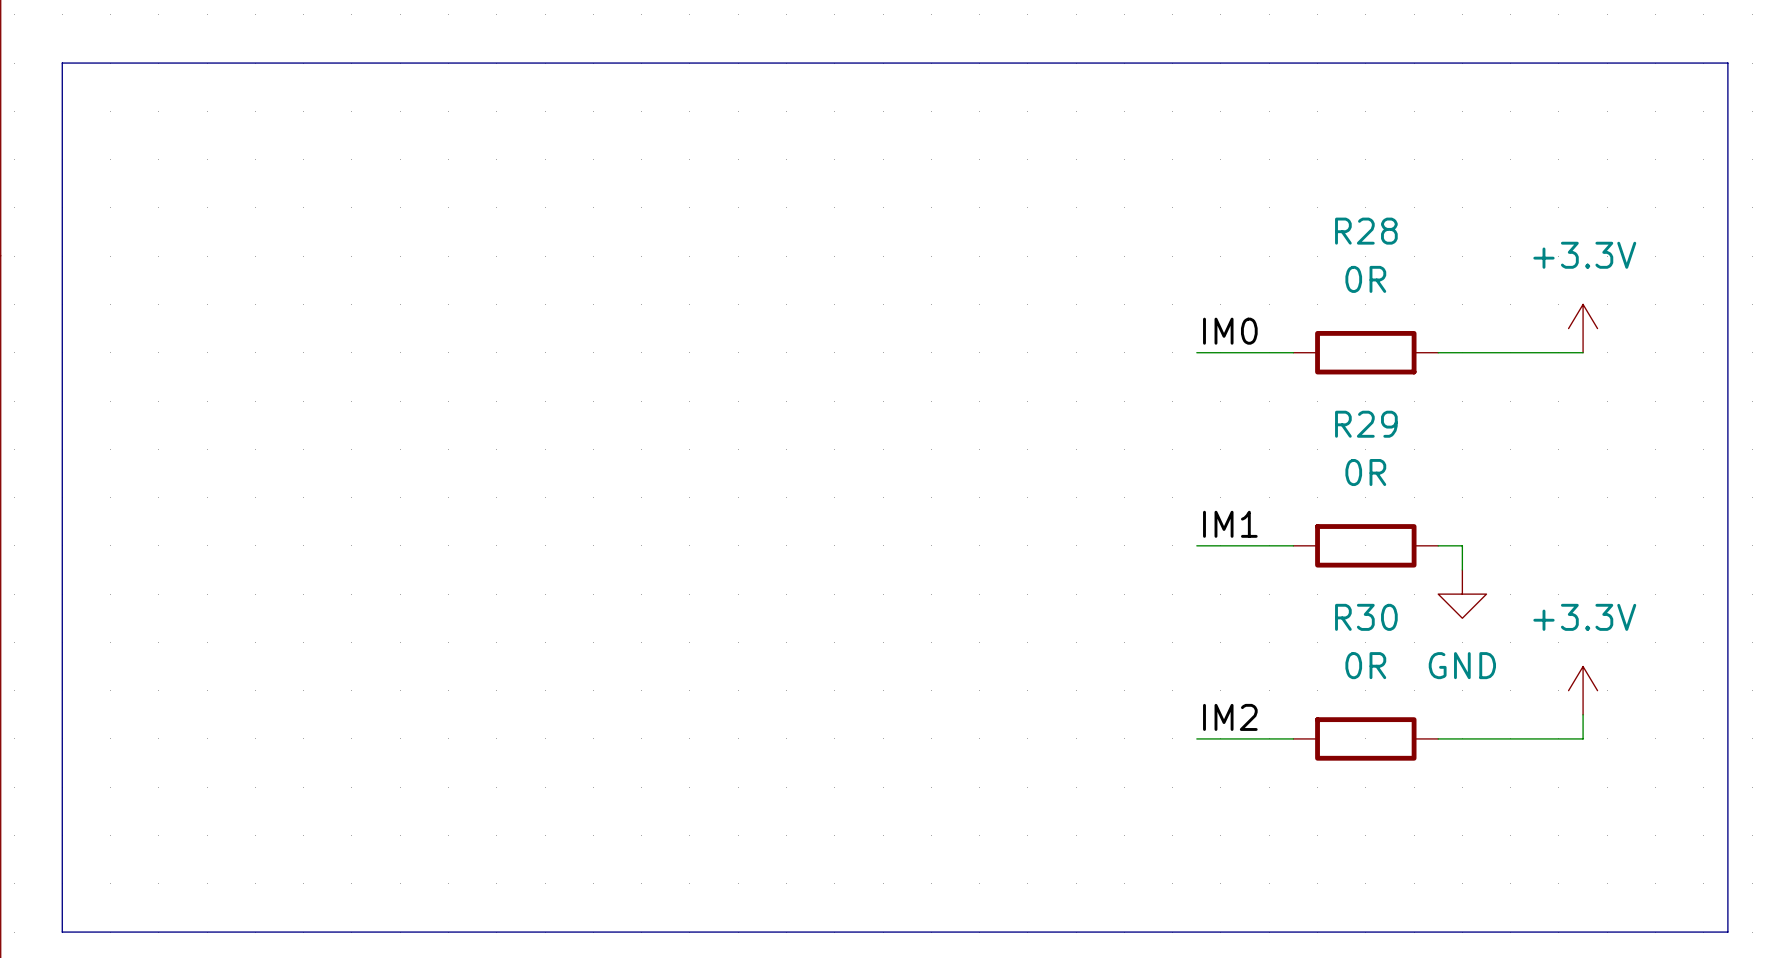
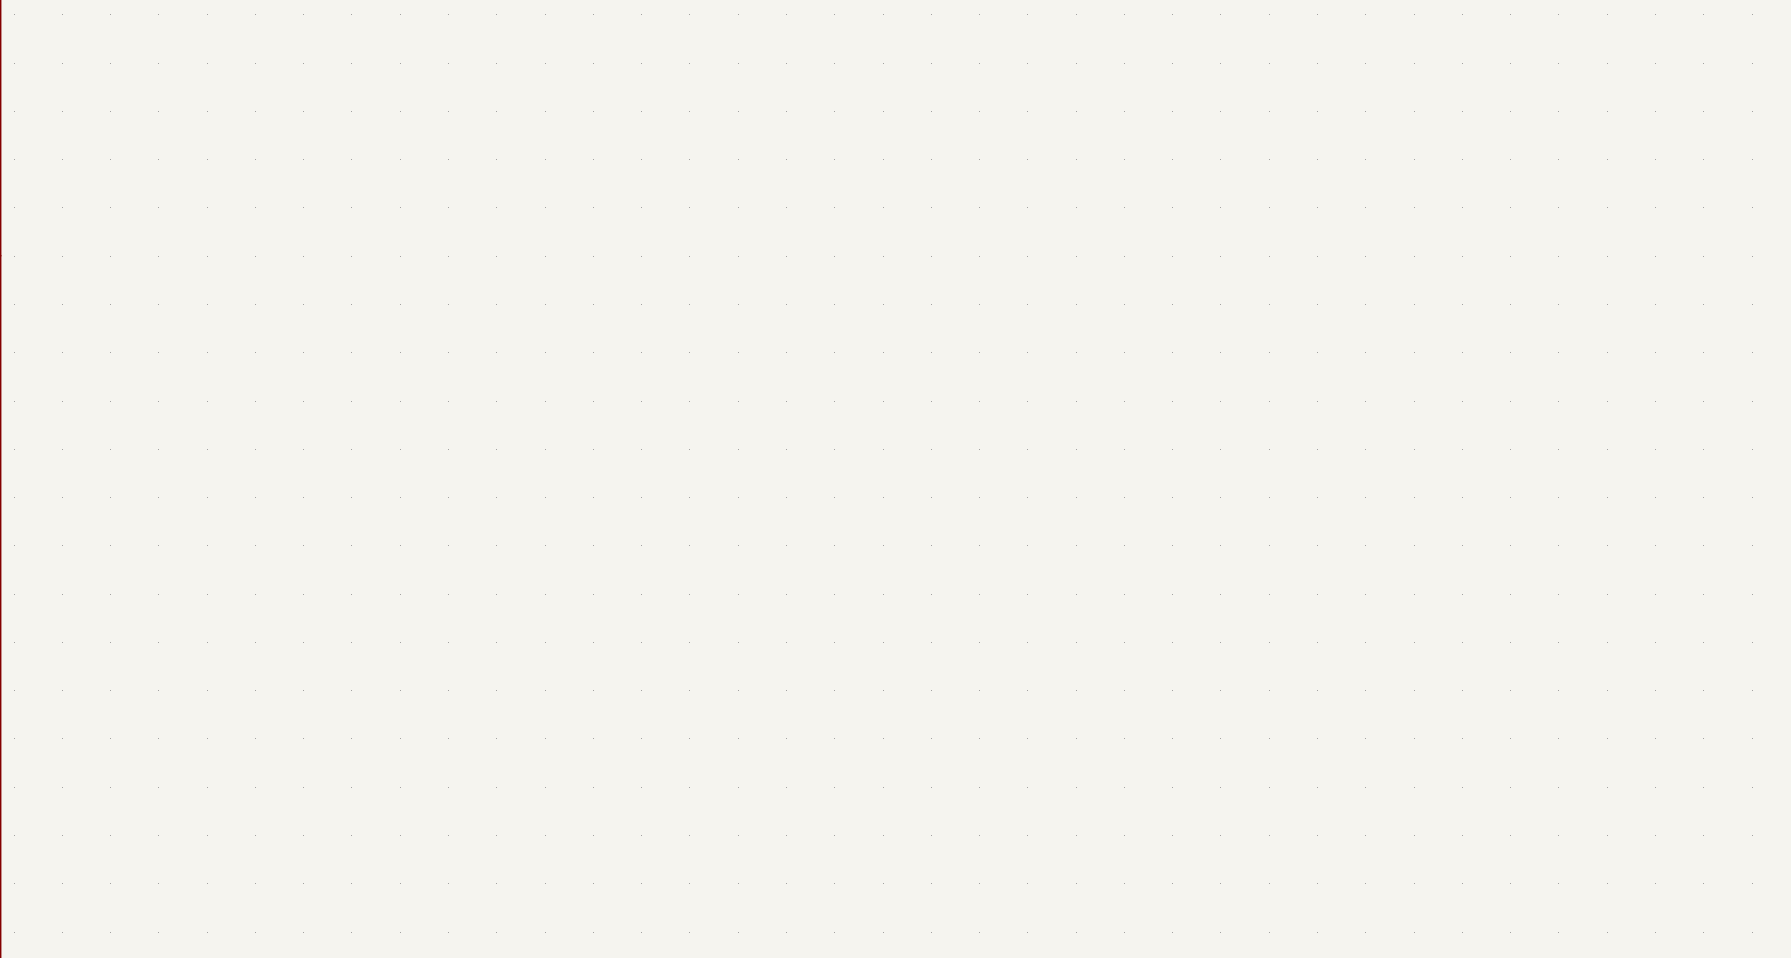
line: (62, 63) (1727, 63) (1727, 932) (62, 932) (62, 63) -> none
power symbol: +3.3V (1583, 328) -> none
label: IM0 (1230, 331) -> none
wire: (1196, 352) (1293, 352) -> none
R28: 0R (1365, 352) -> none
wire: (1438, 352) (1583, 352) -> none
label: IM1 (1230, 524) -> none
wire: (1196, 545) (1293, 545) -> none
R29: 0R (1365, 545) -> none
wire: (1438, 545) (1462, 545) (1462, 569) -> none
power symbol: GND (1462, 594) -> none
power symbol: +3.3V (1583, 690) -> none
wire: (1583, 714) (1583, 738) (1438, 738) -> none
label: IM2 (1230, 717) -> none
wire: (1196, 738) (1293, 738) -> none
R30: 0R (1365, 738) -> none

